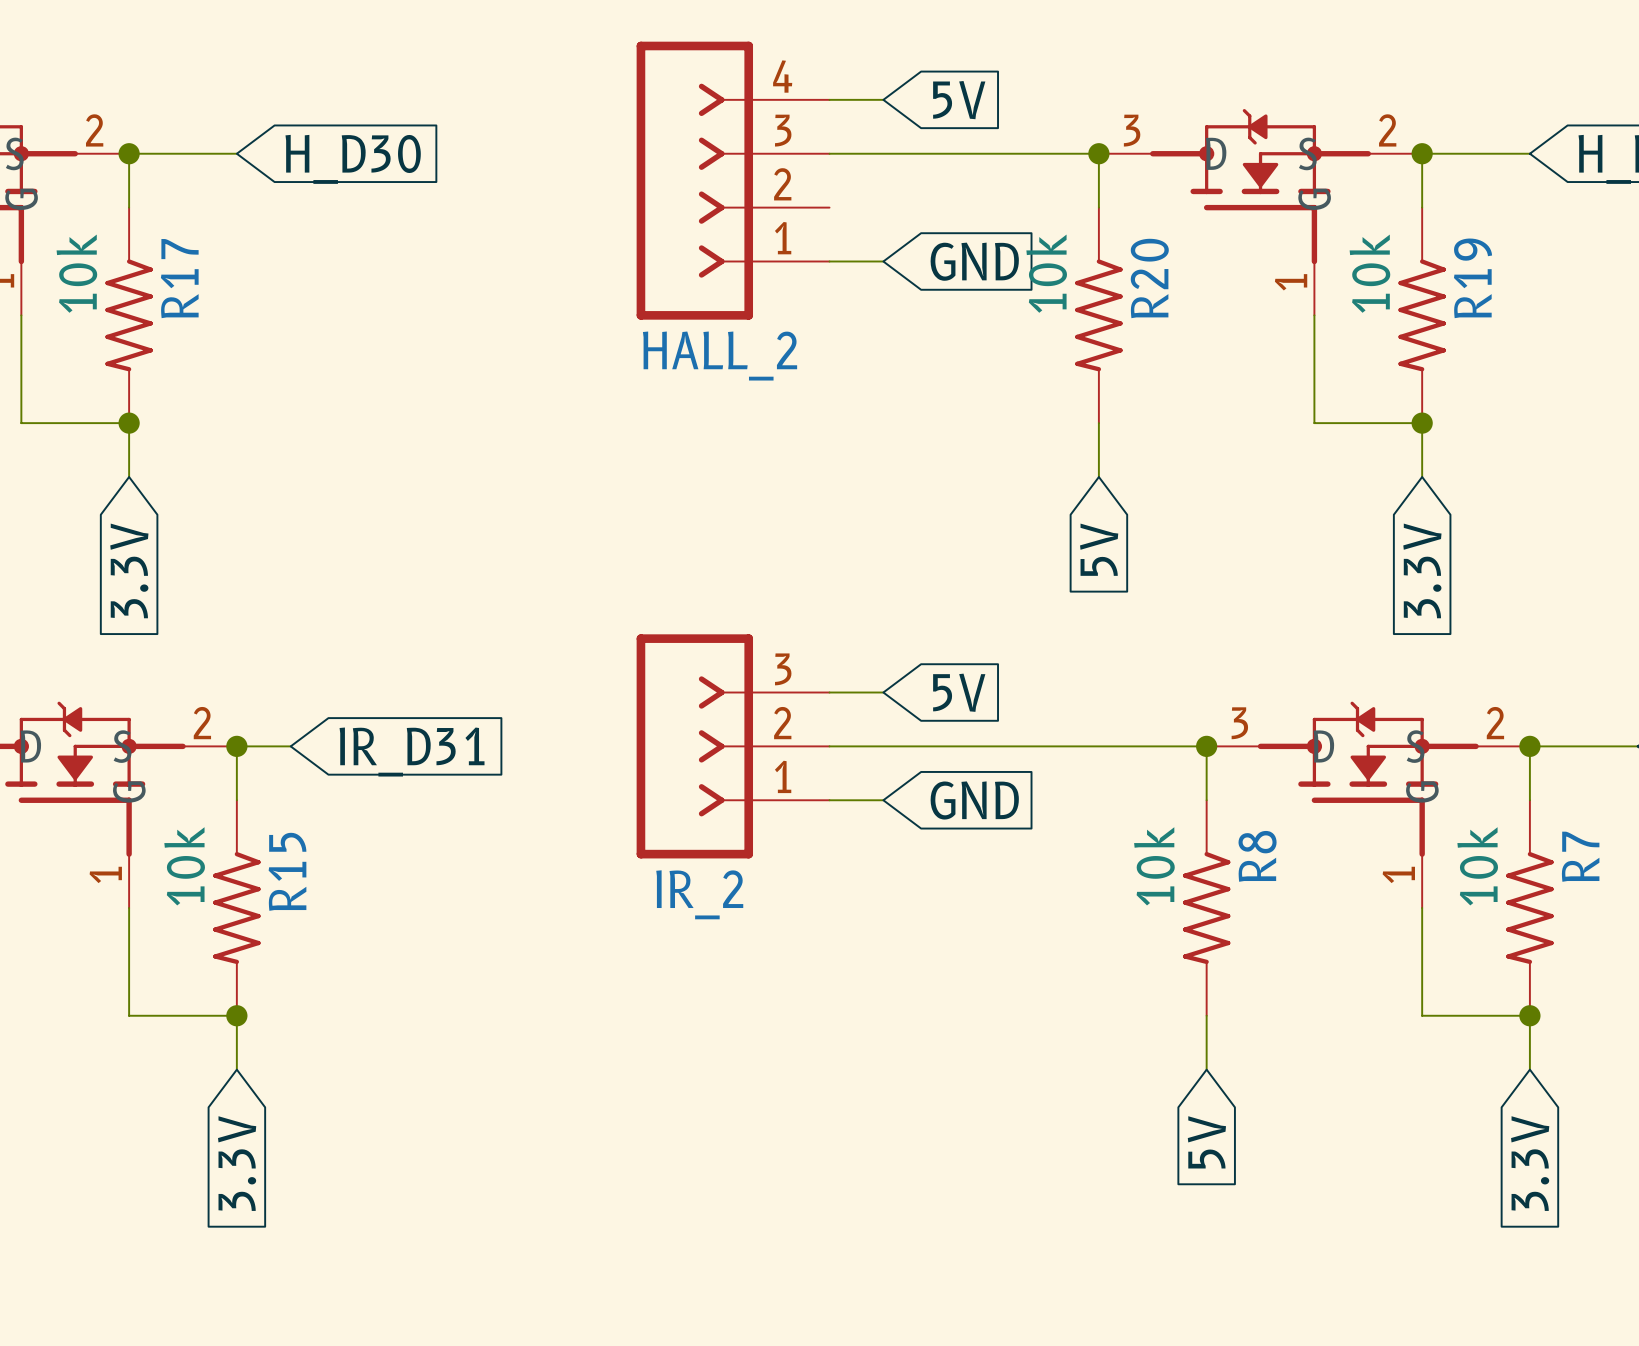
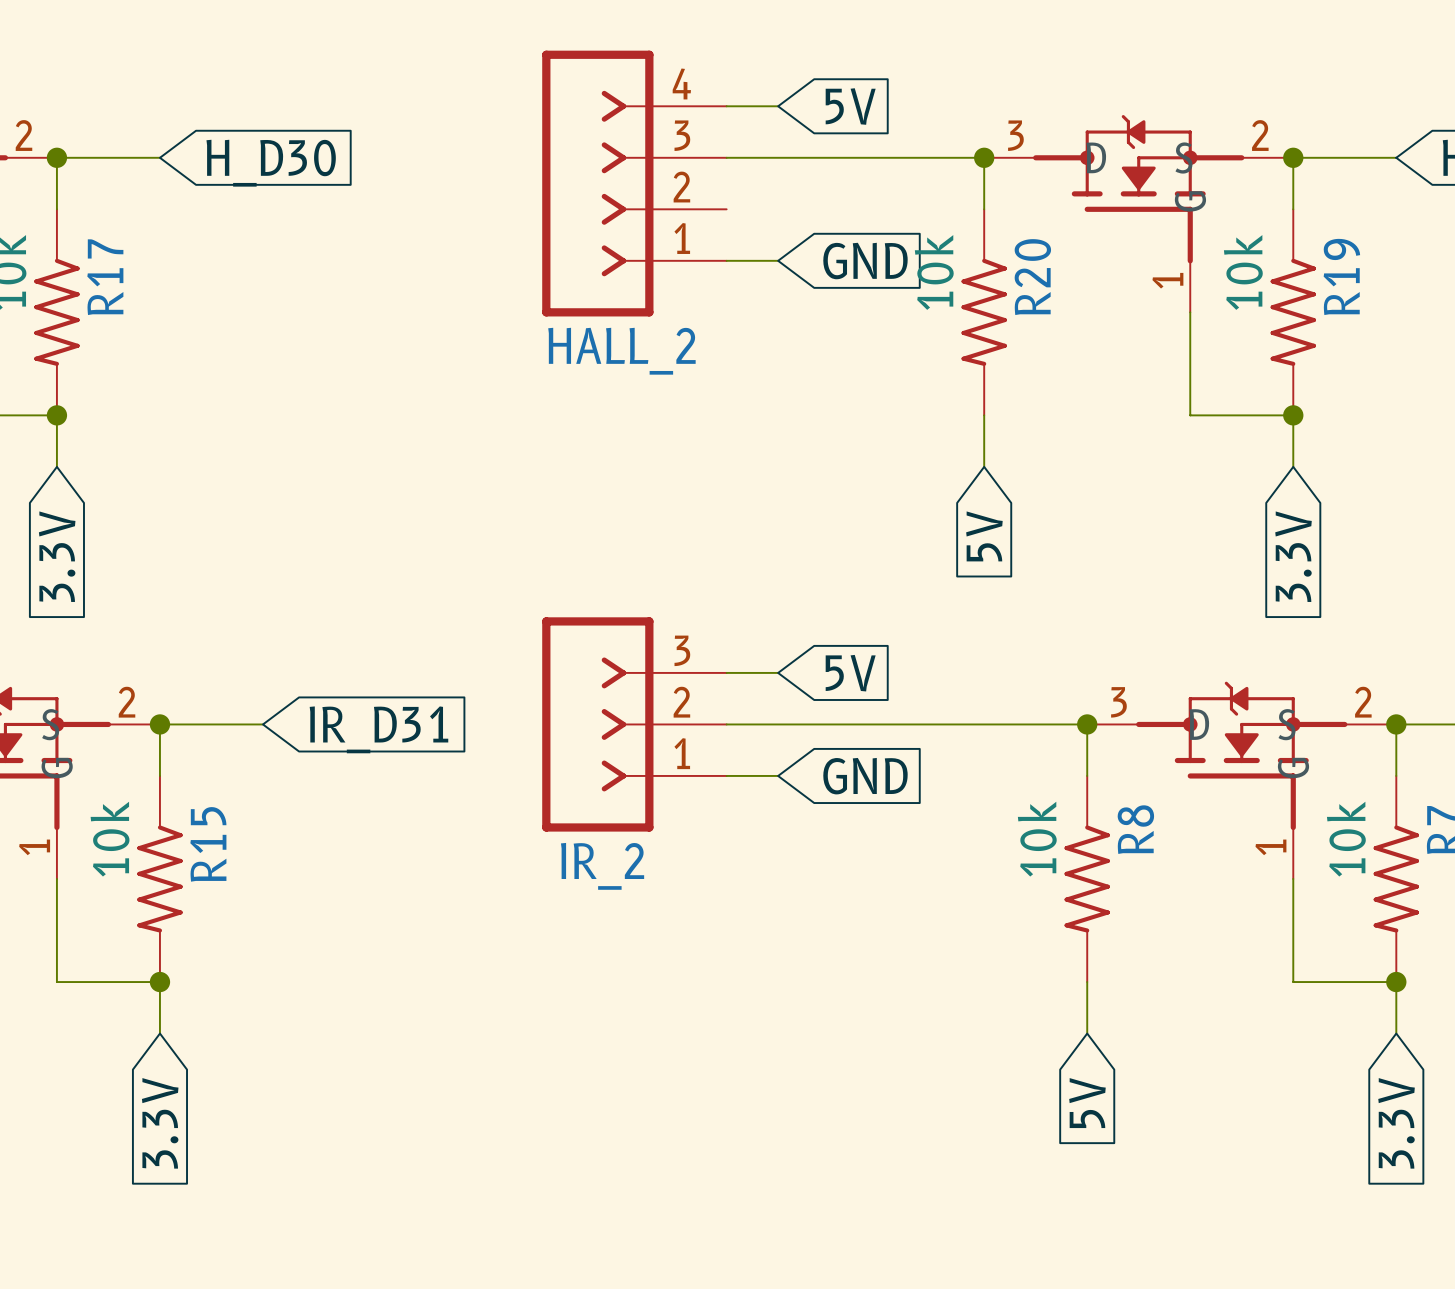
wire: none -> (211, 724) (263, 724)
global label position: IR_D31 (412, 752) -> IR_D31 (378, 729)

